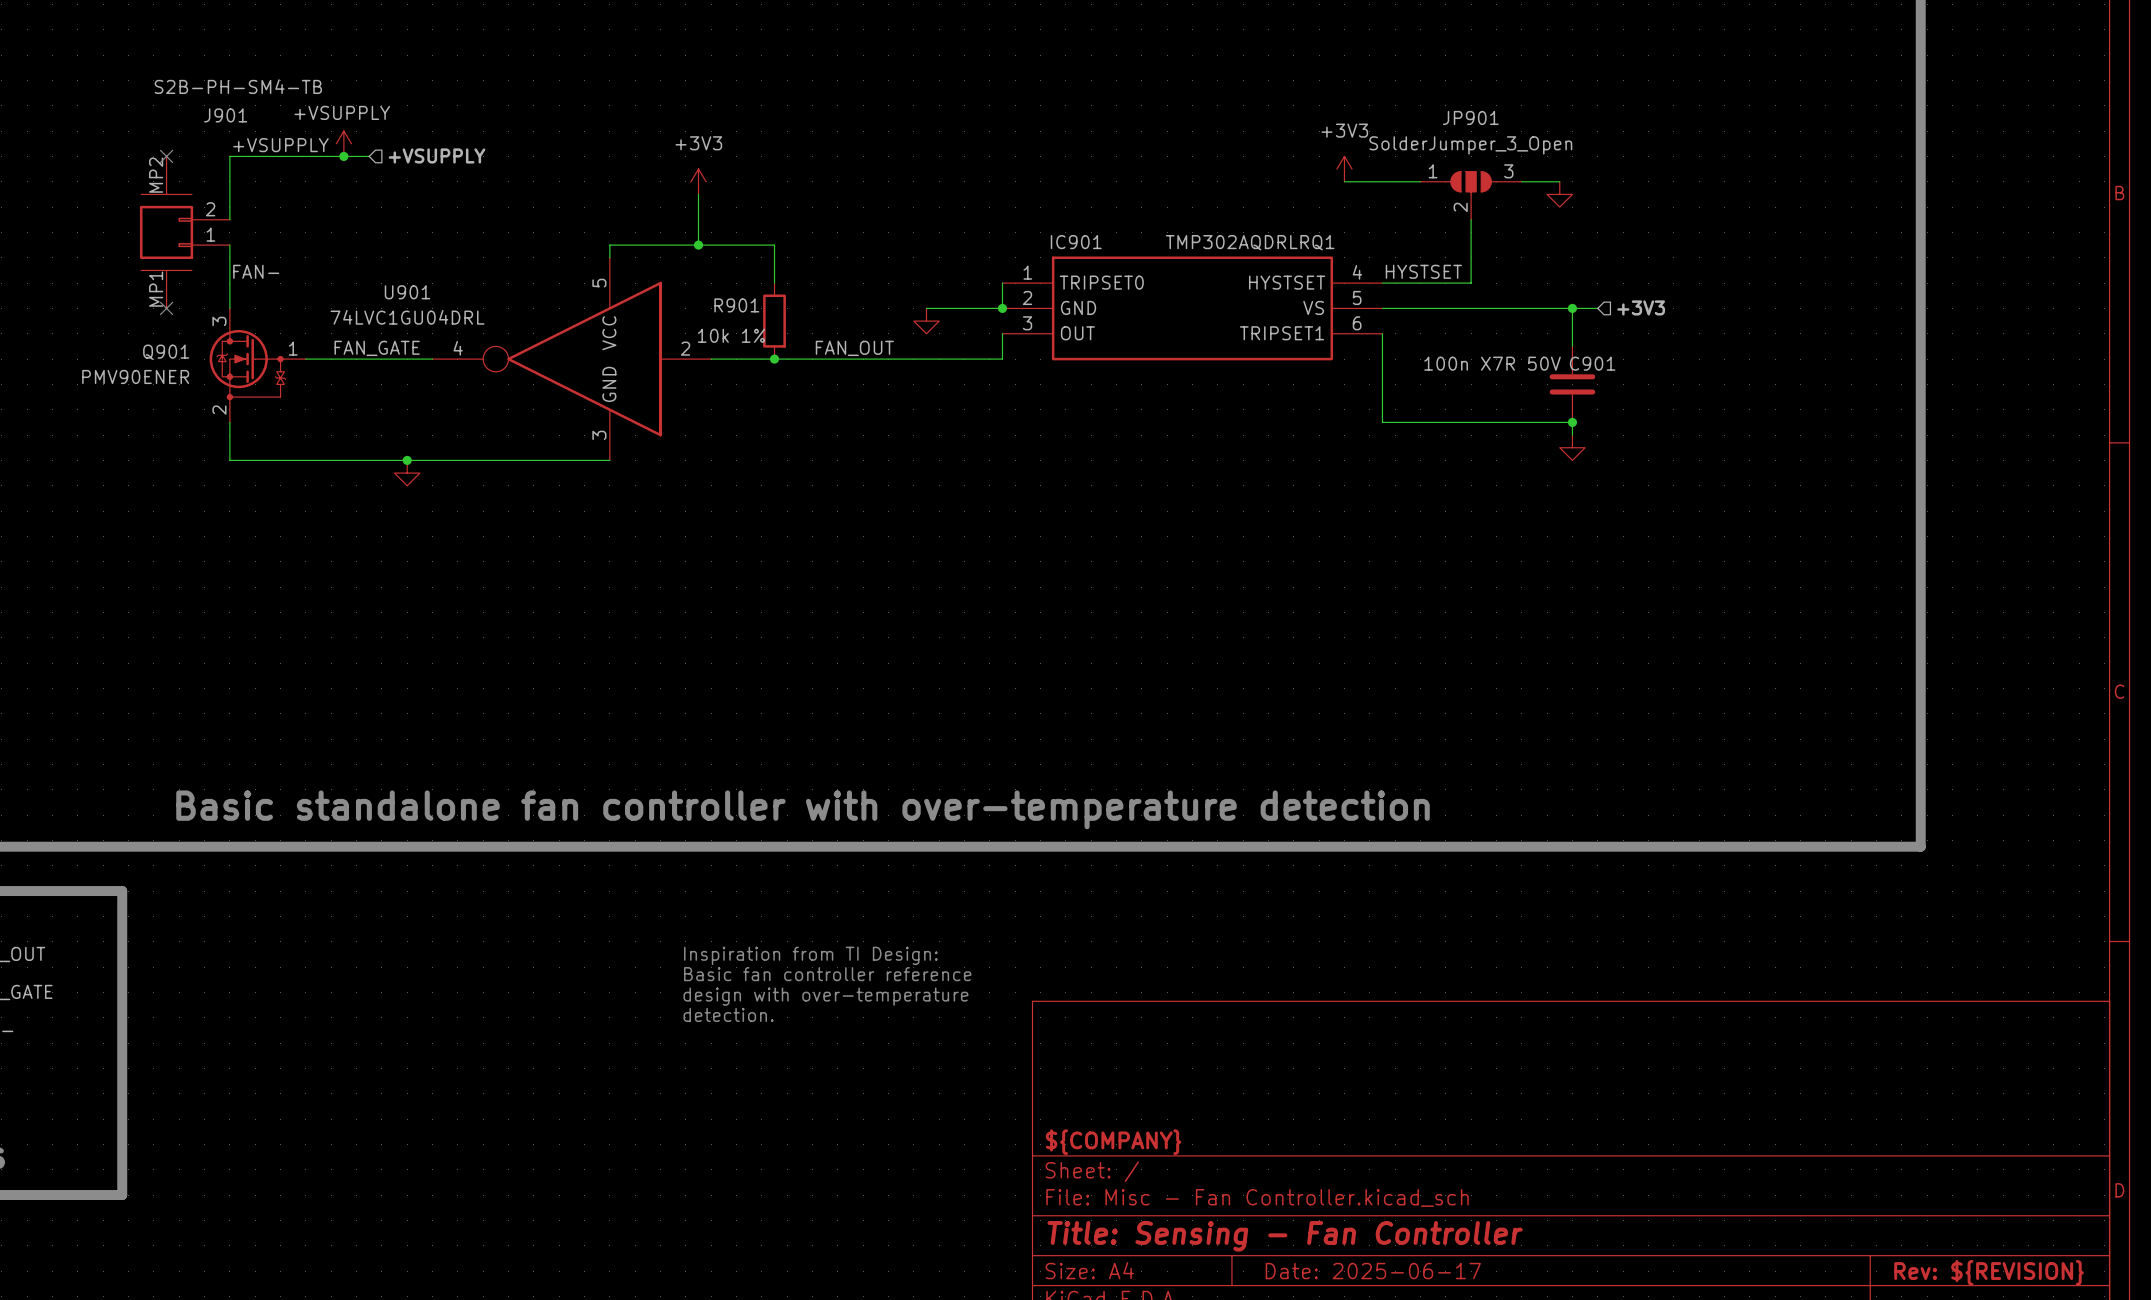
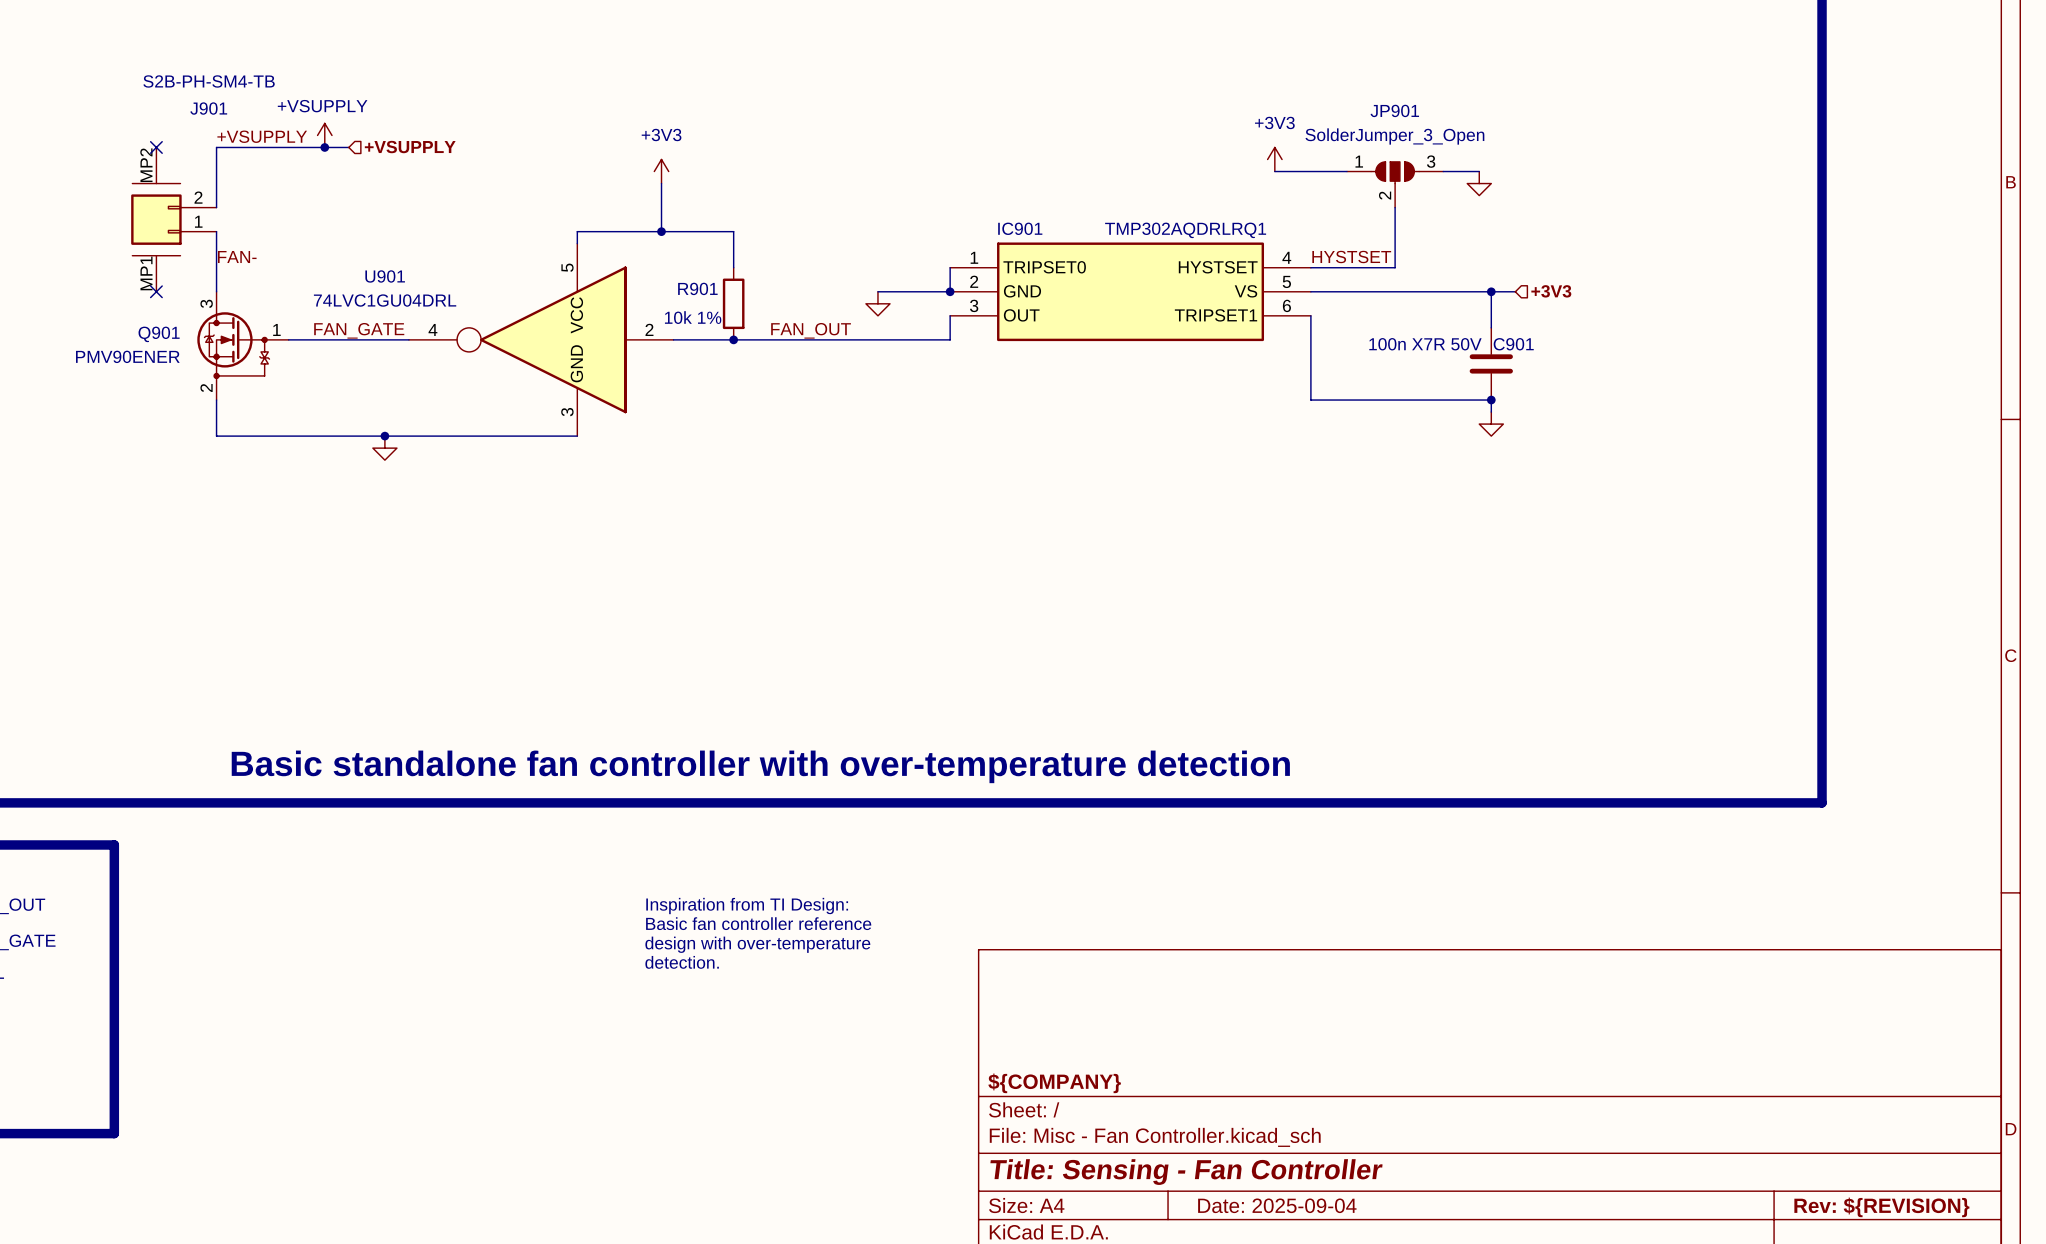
title block: Date: 2025-06-17 (1373, 1271) -> Date: 2025-09-04 (1277, 1205)

